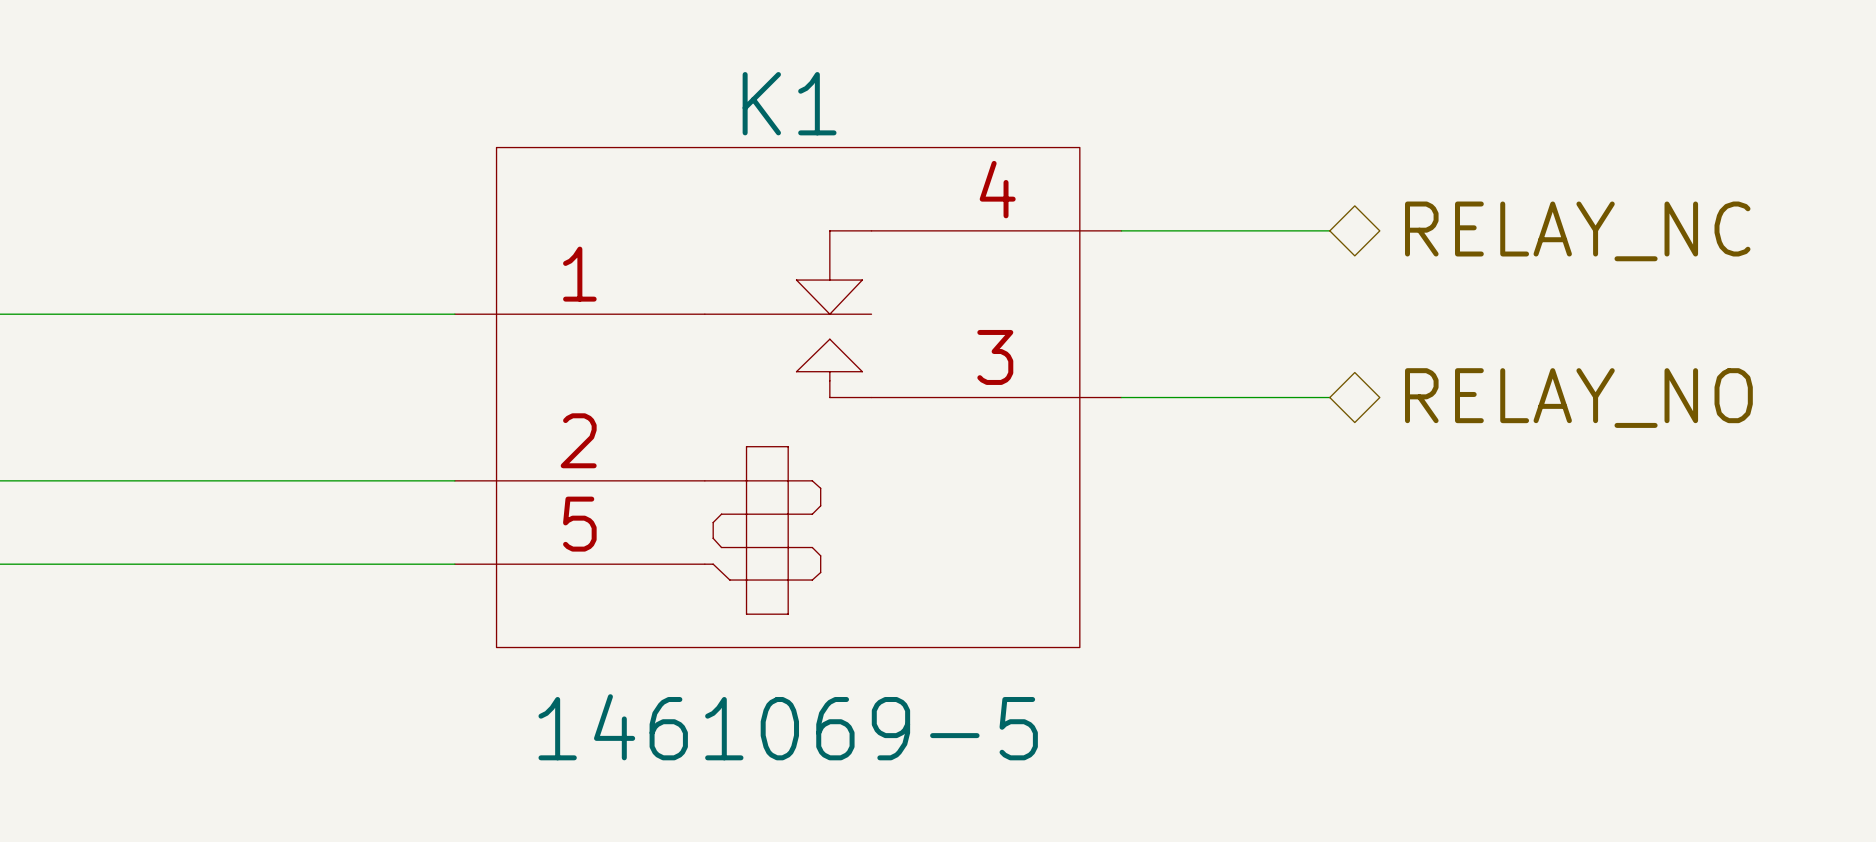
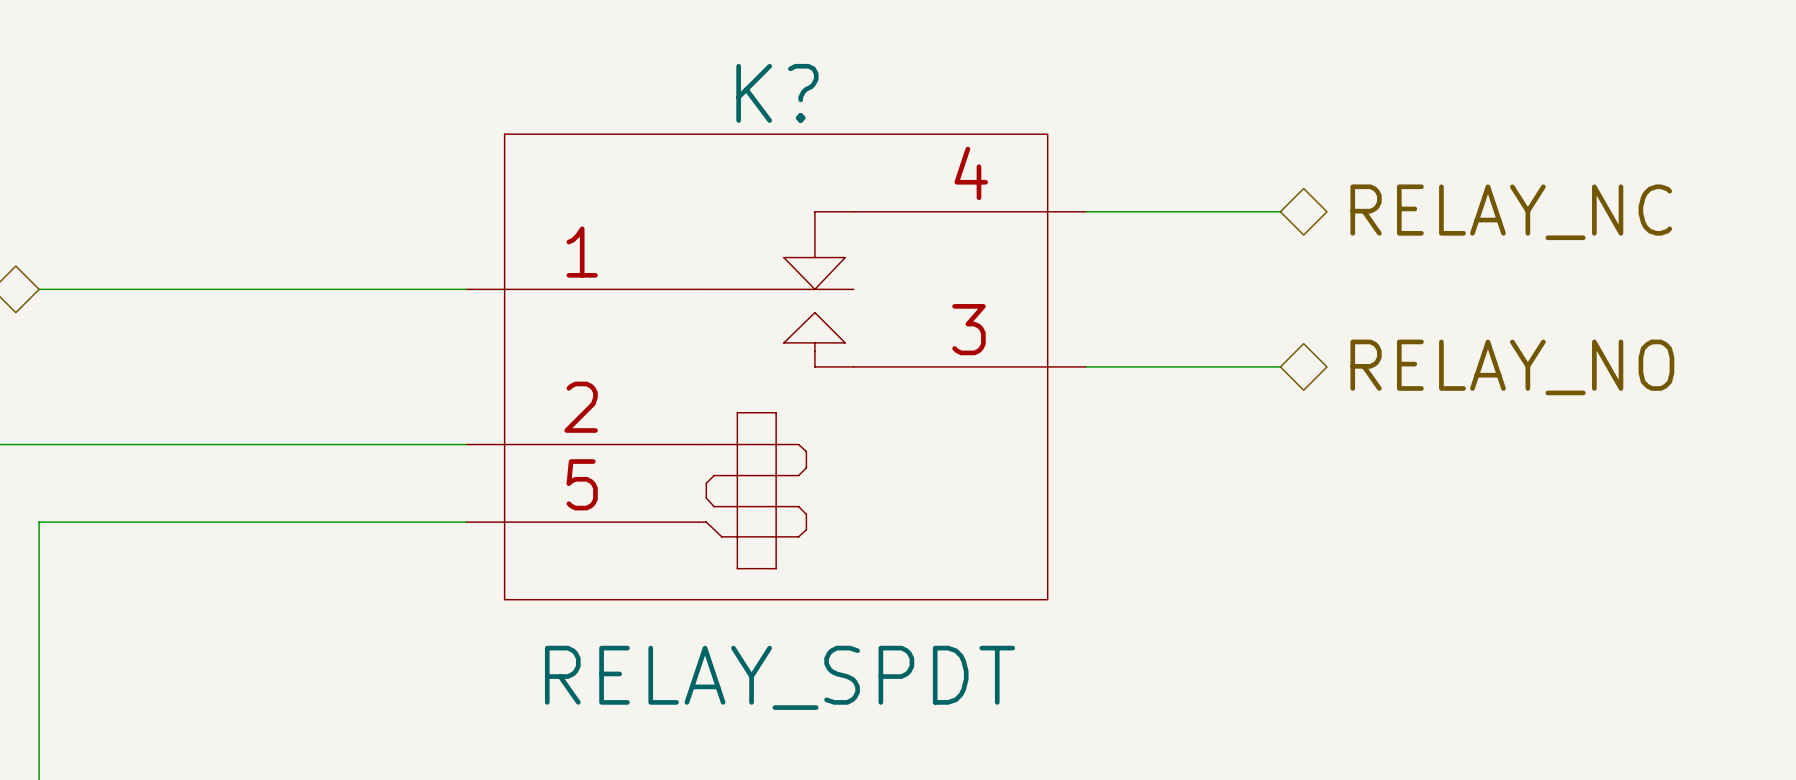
K1 name: K1 (789, 103) -> K? (777, 93)
K1 value: 1461069-5 (788, 727) -> RELAY_SPDT (780, 677)

